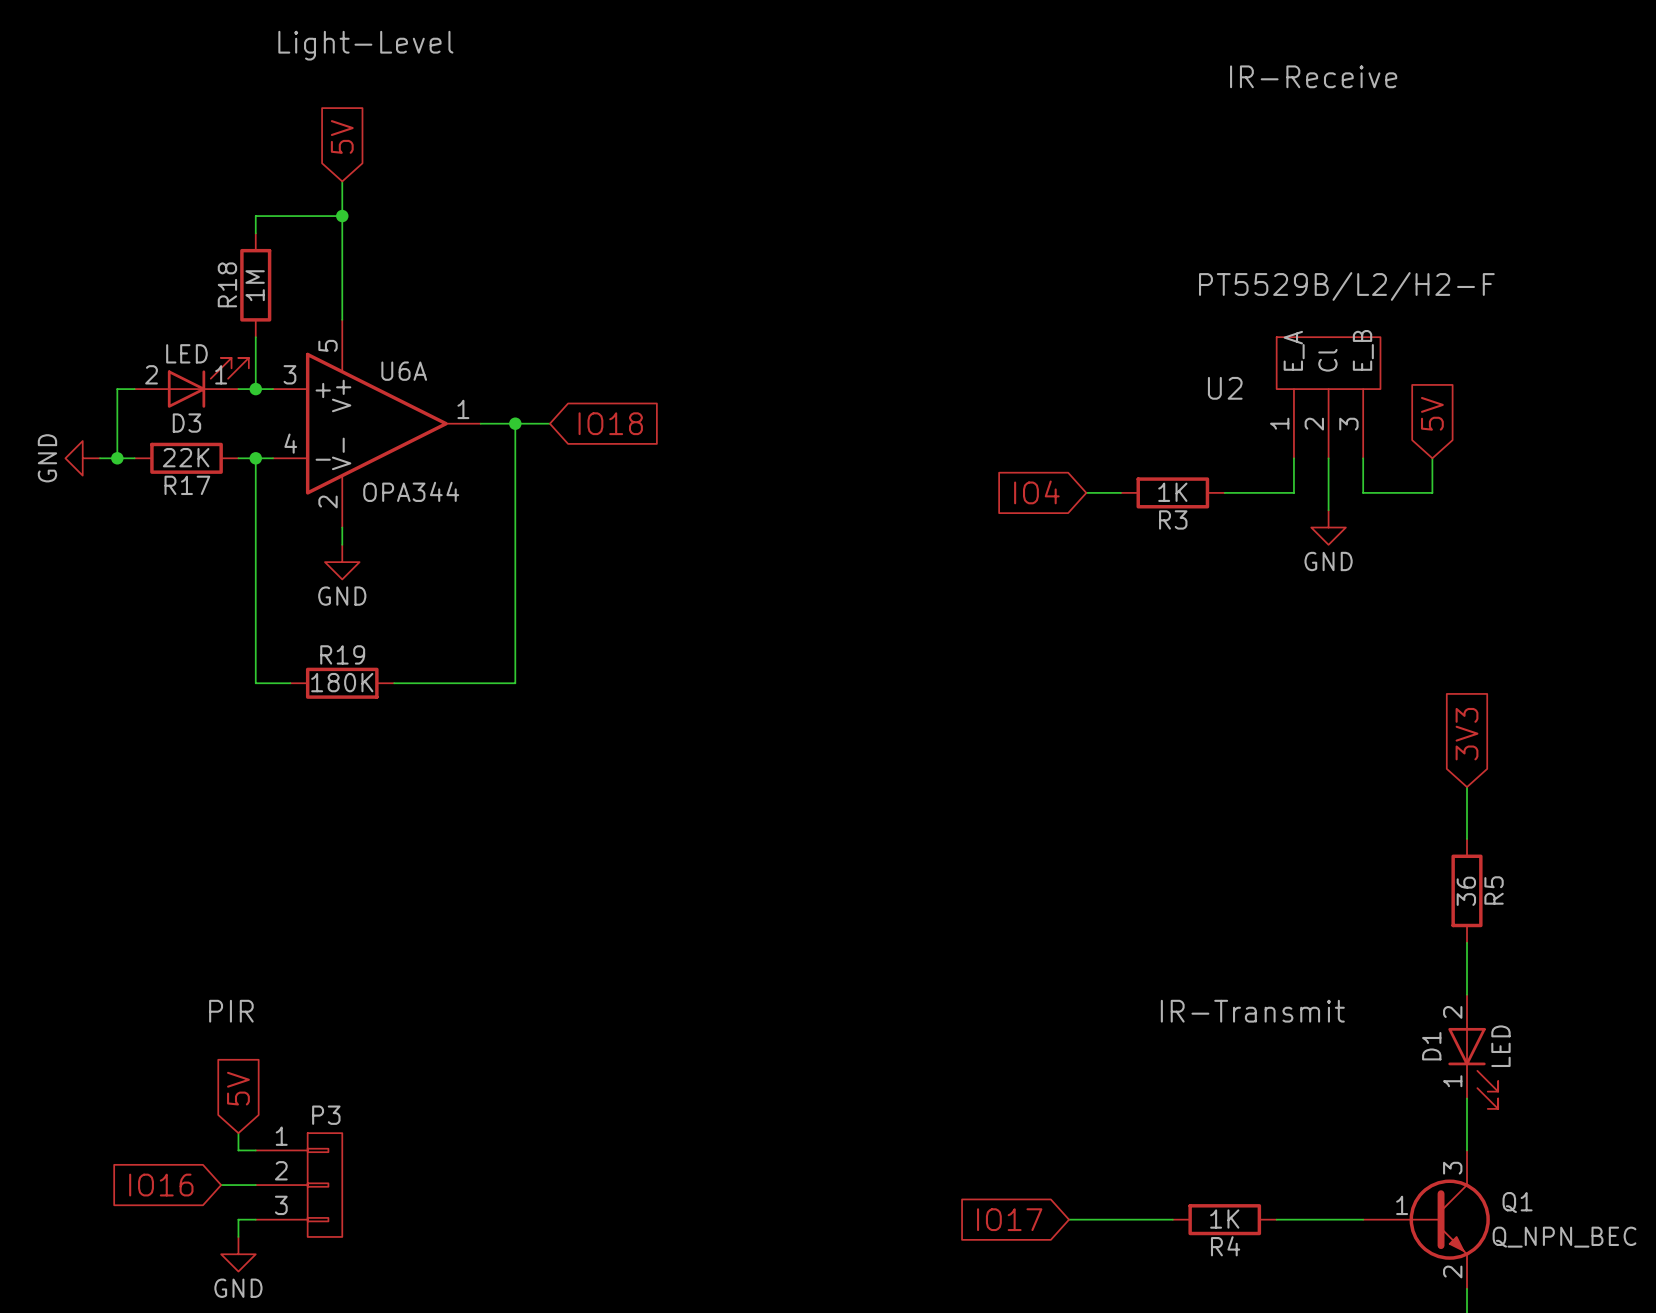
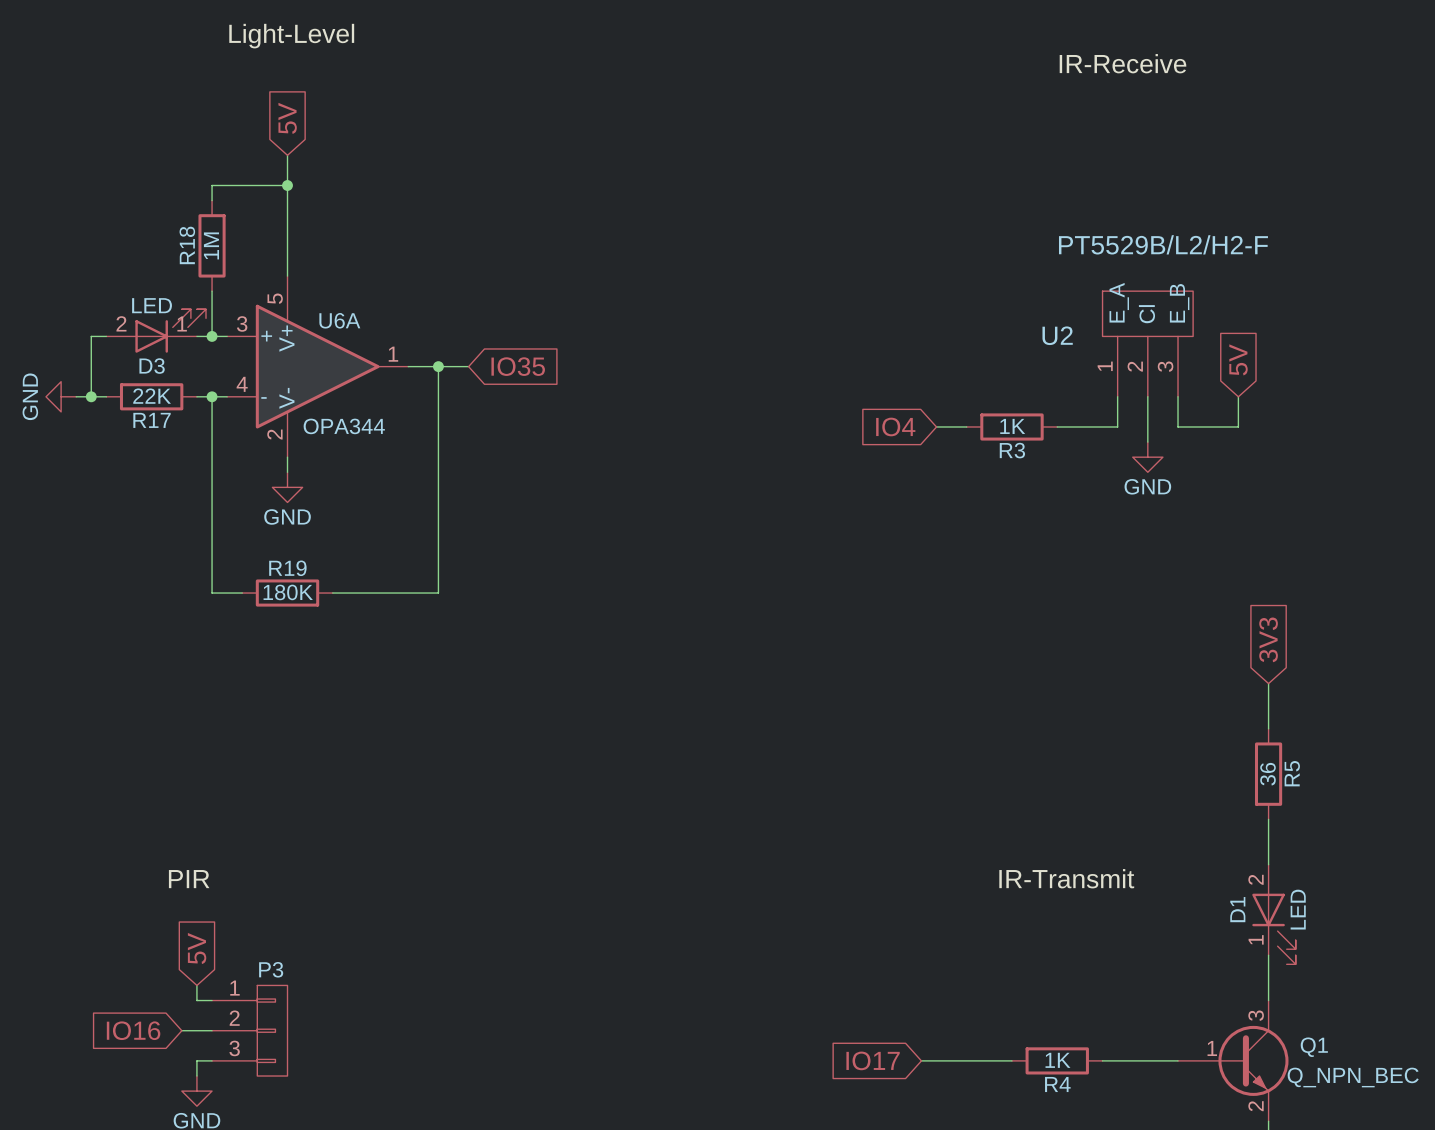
global label: IO18 (610, 423) -> IO35 (518, 366)

